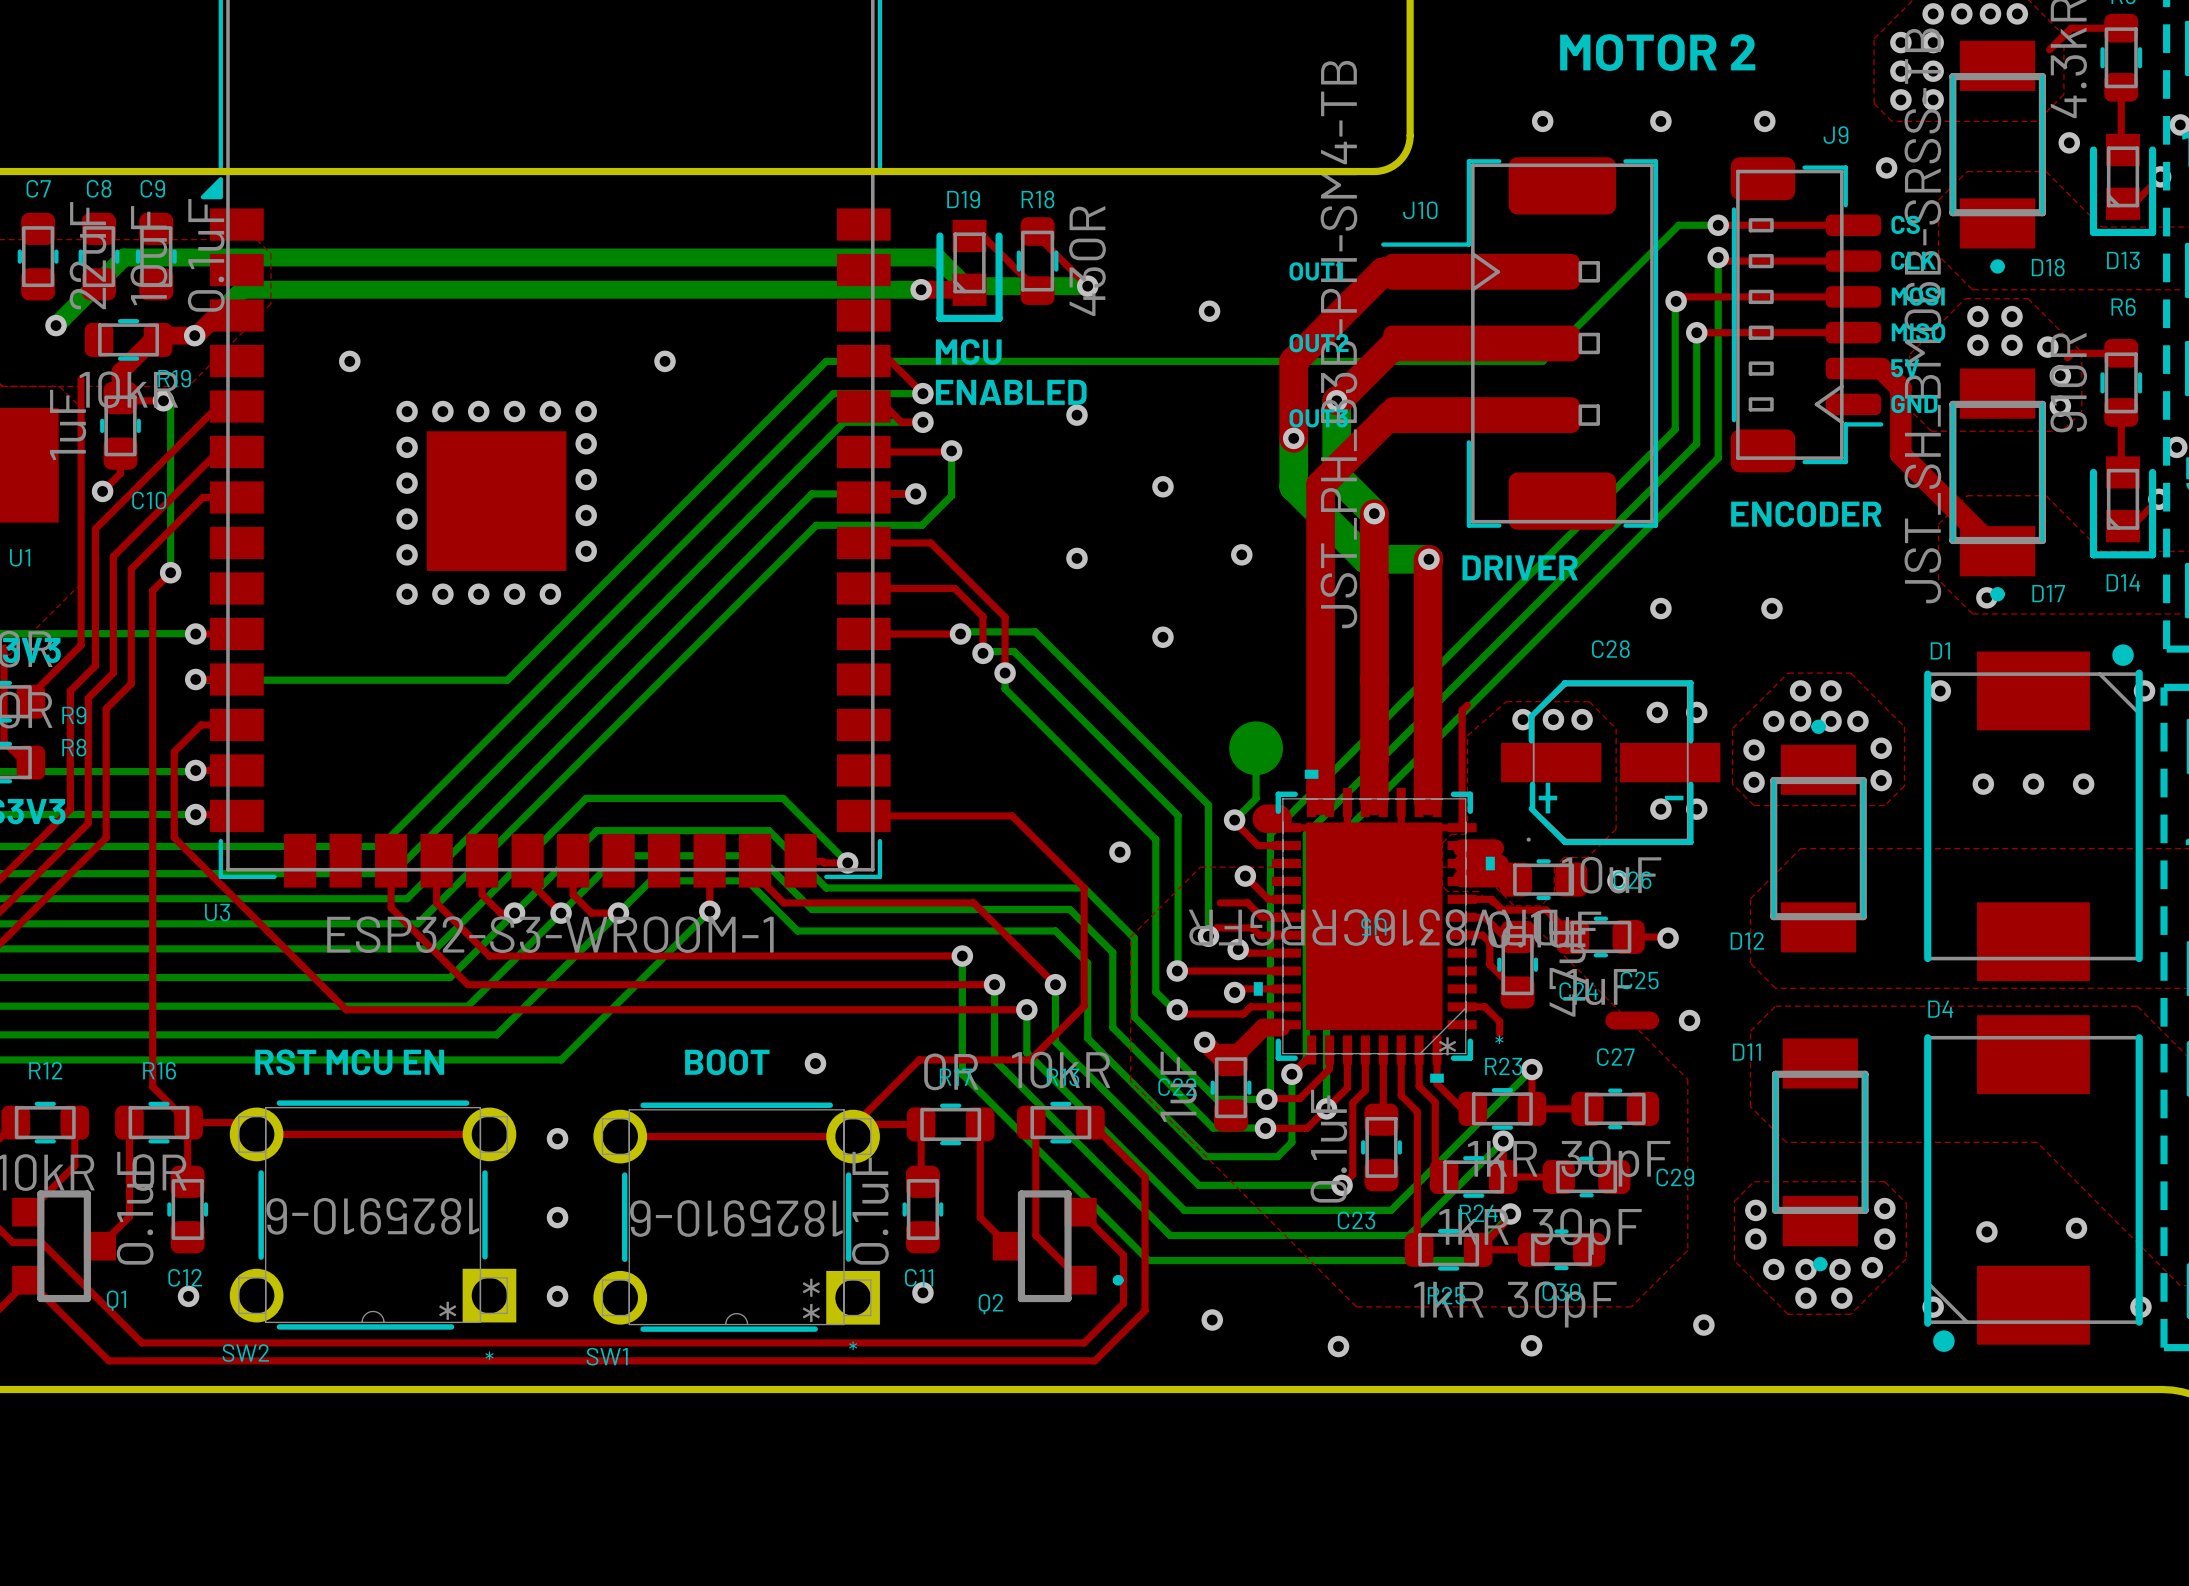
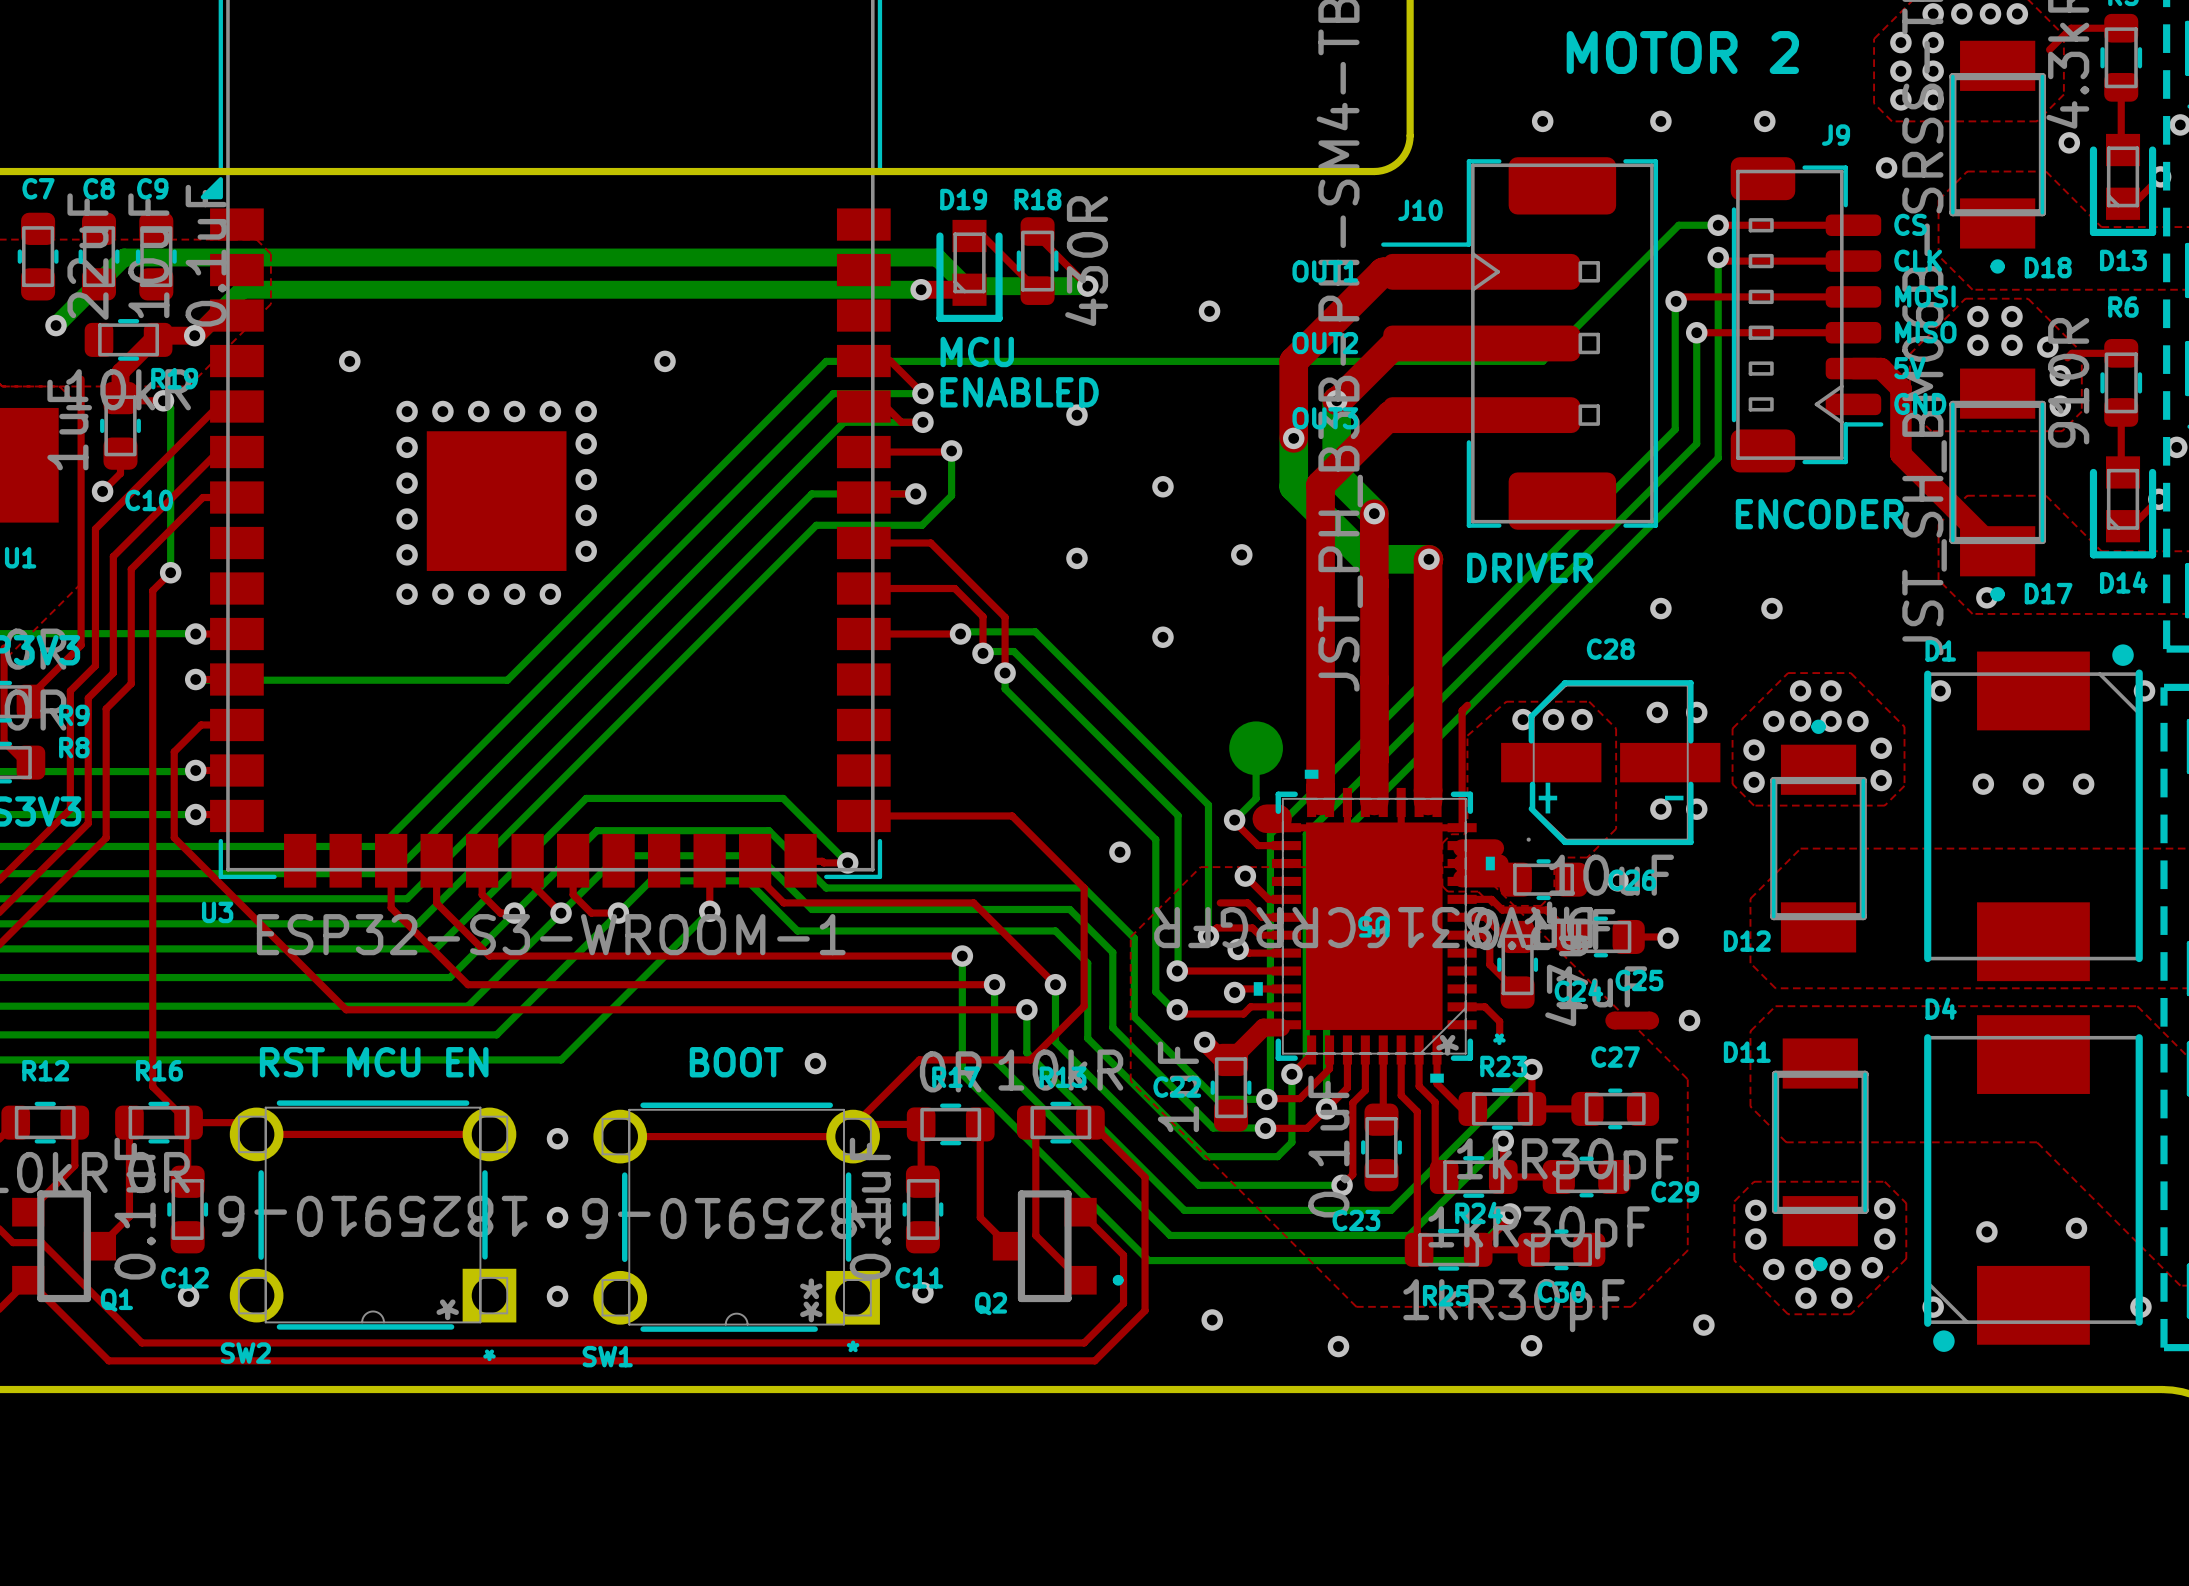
C29 name position: C29 (1675, 1177) -> C29 (1675, 1191)

